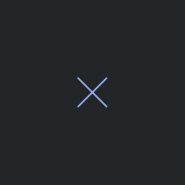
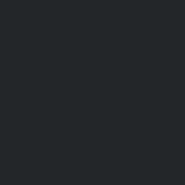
no-connect mark: (92, 92) -> none

